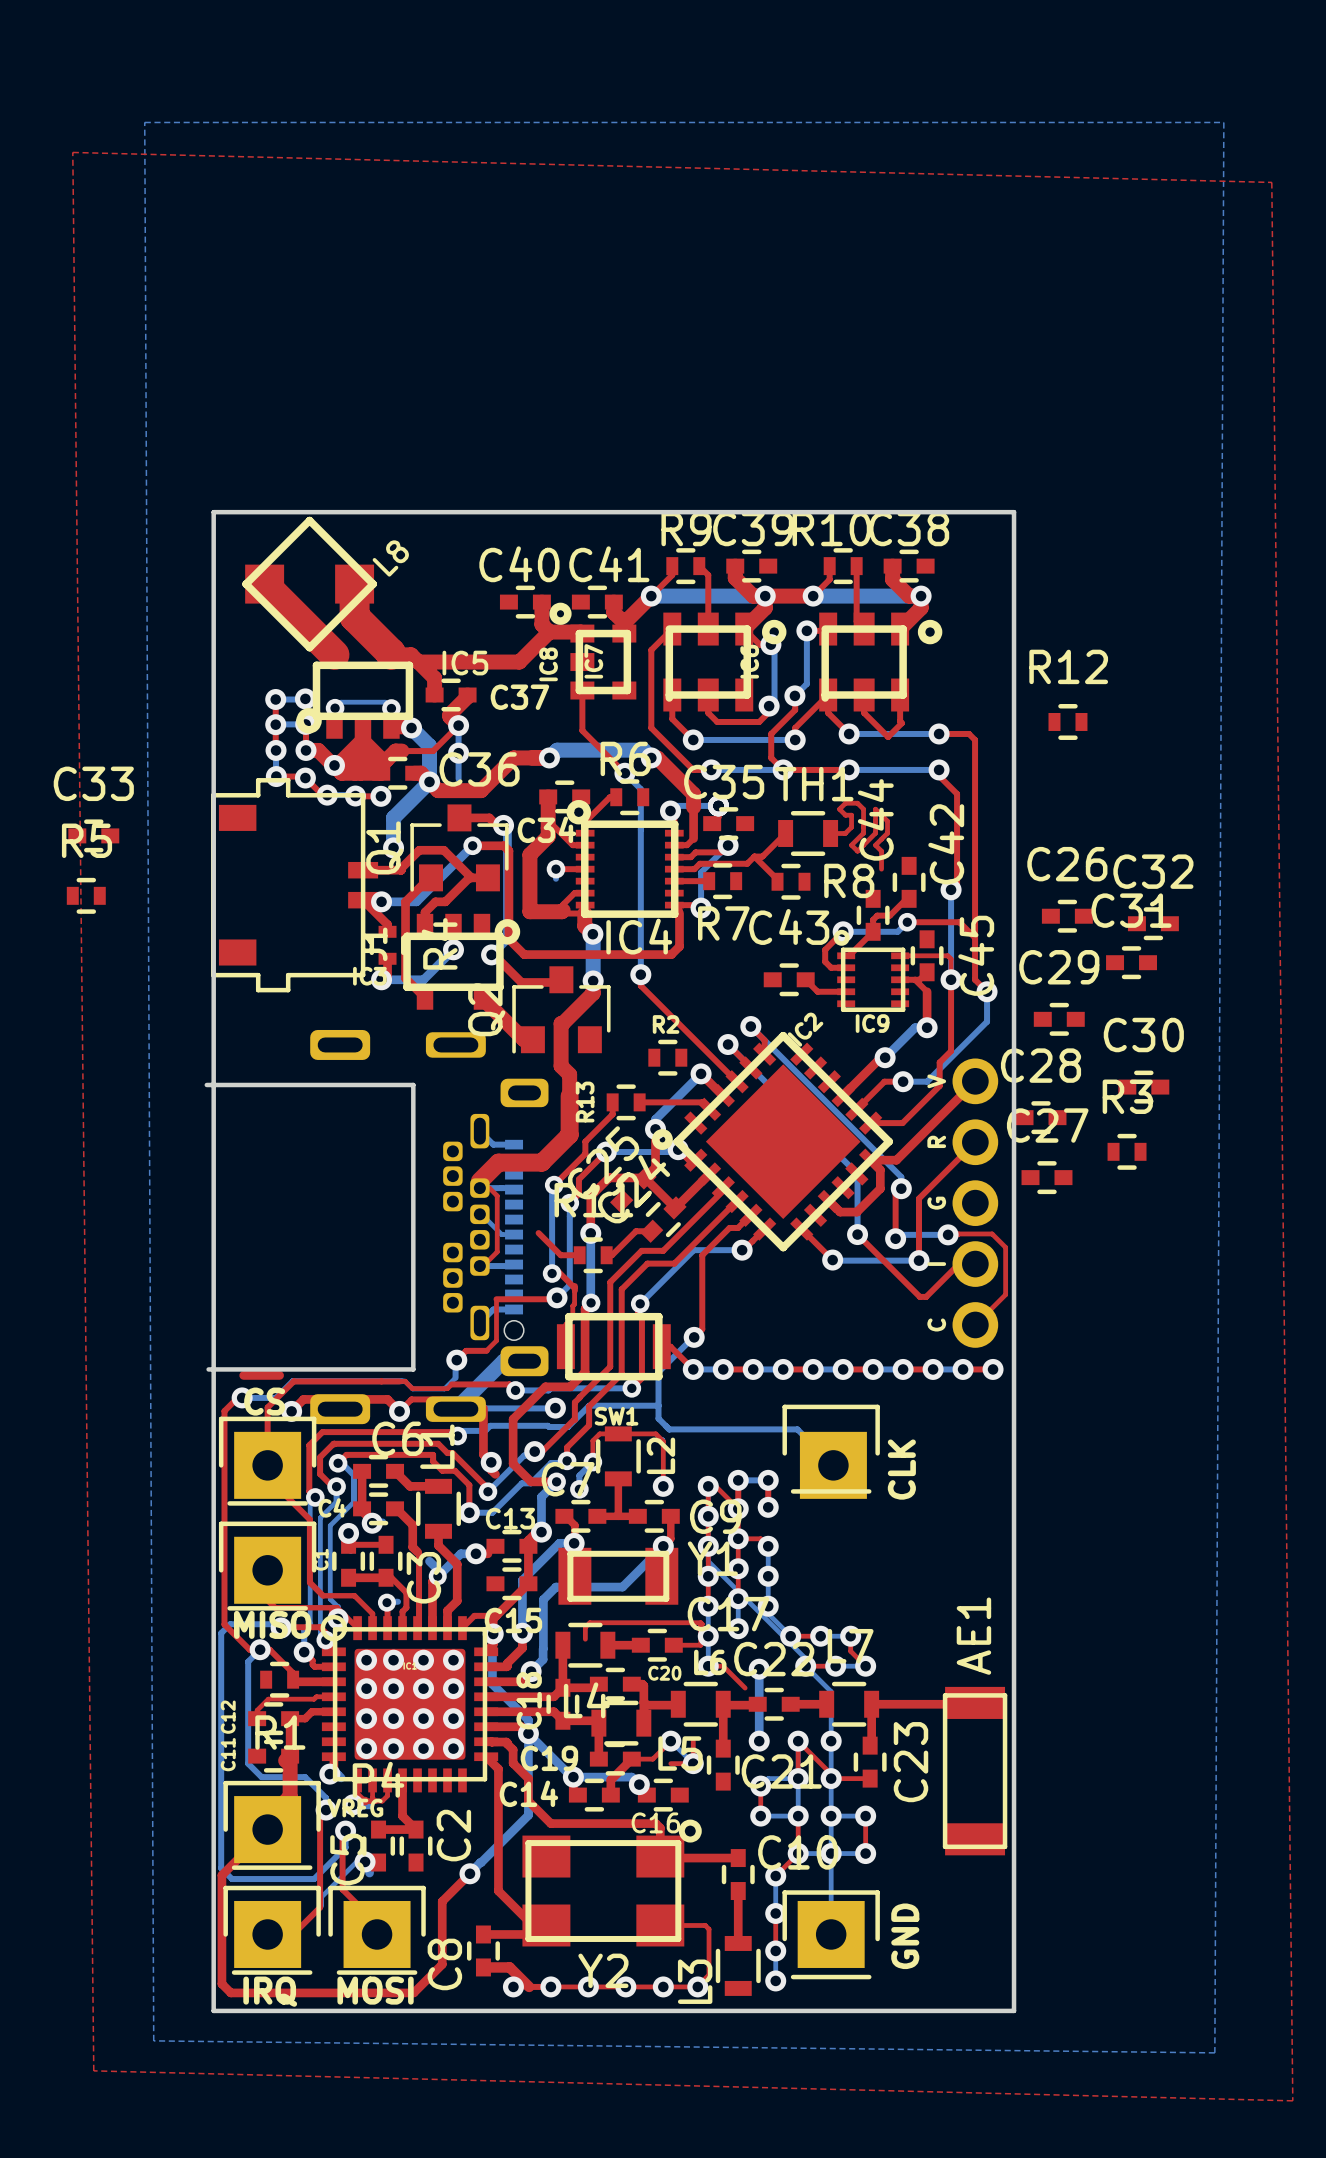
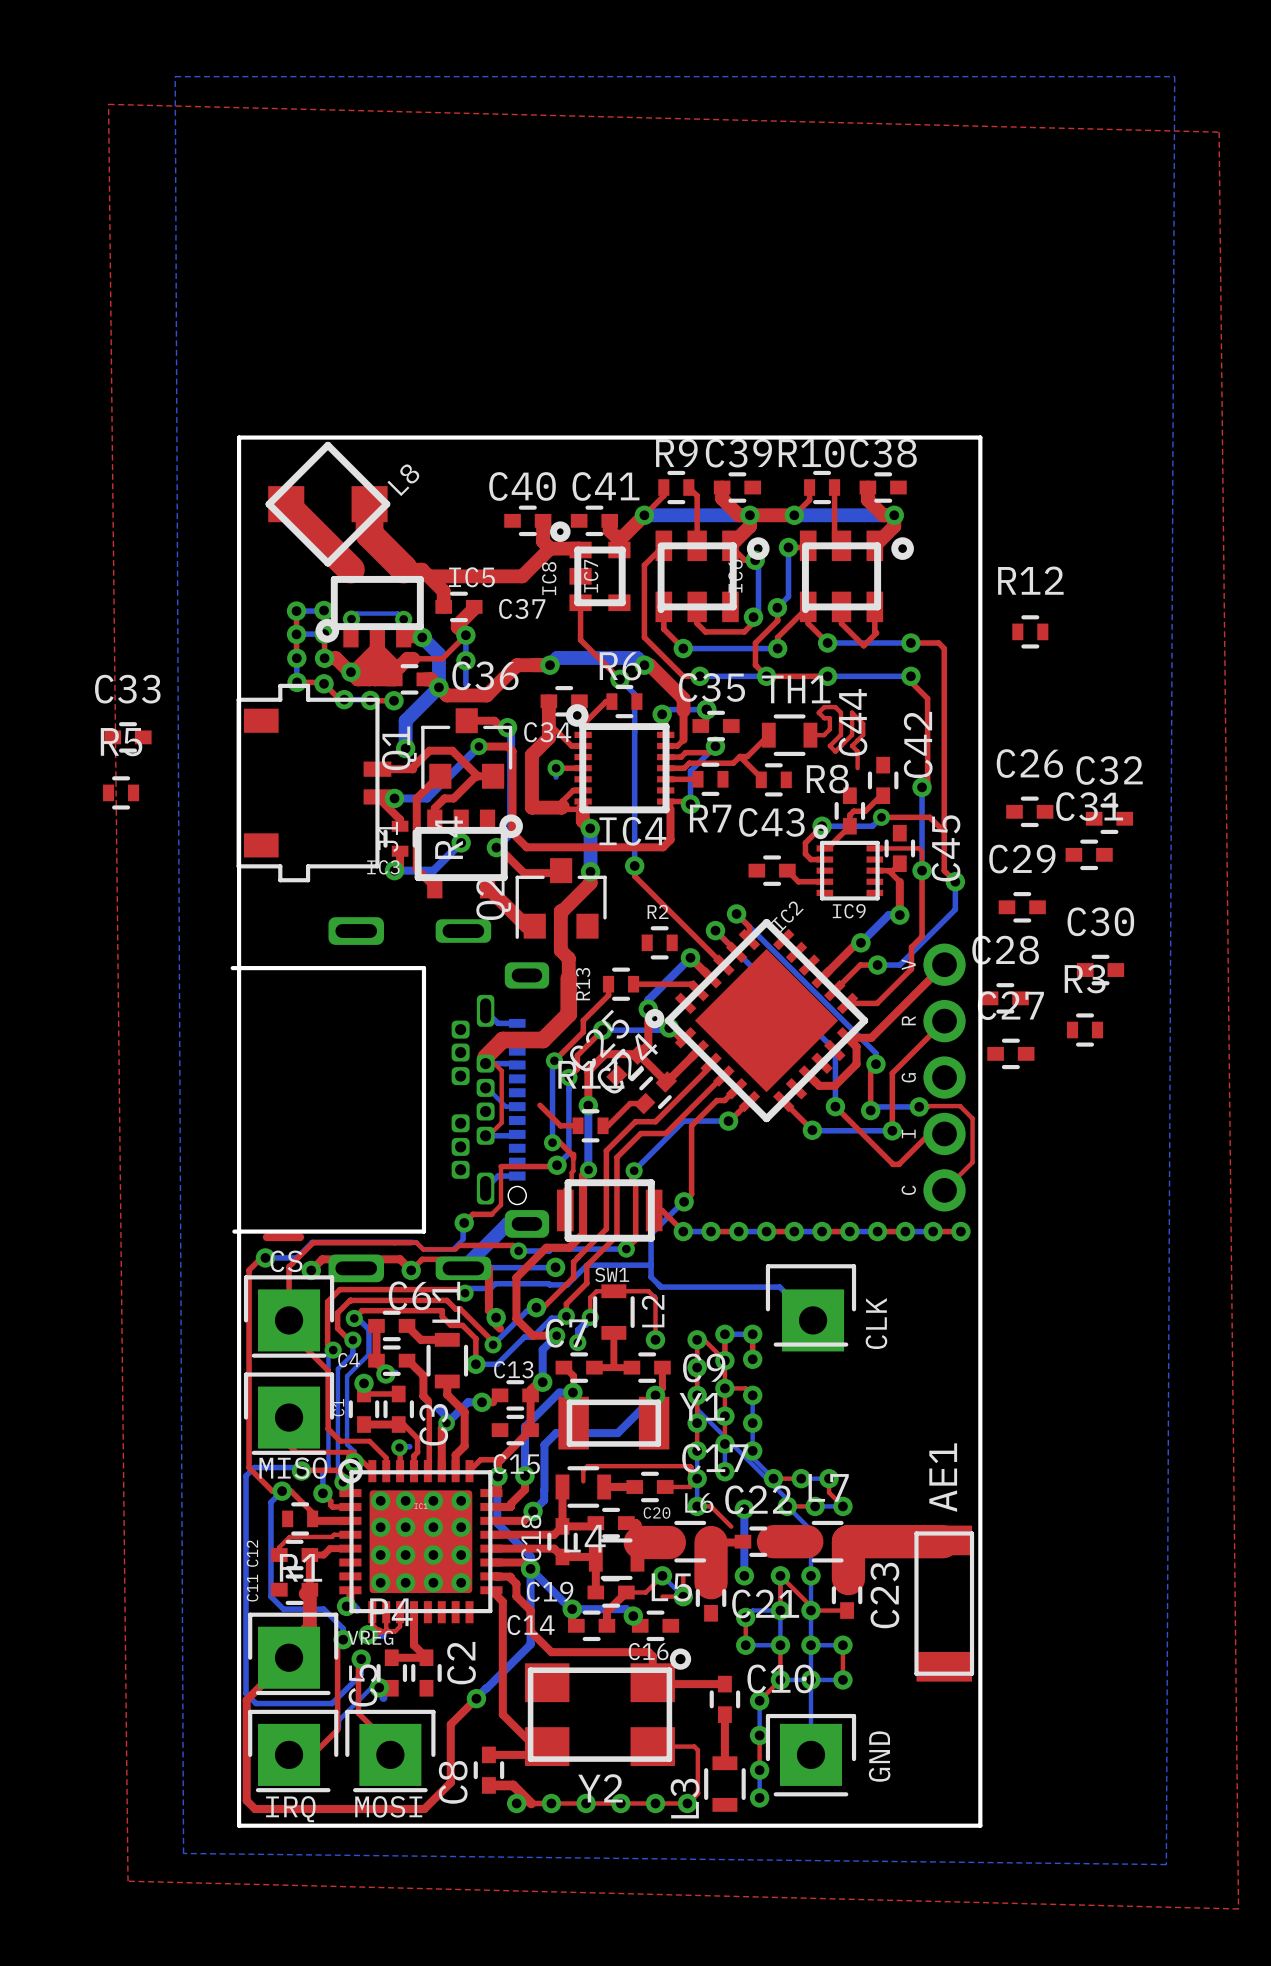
top track width: thin (790, 1704) (826, 1704) -> thick (773, 1541) (806, 1541)
top track width: thin (973, 1704) (871, 1704) (871, 1744) -> thick (943, 1541) (848, 1541) (848, 1578)
top track width: thin (646, 1705) (678, 1705) -> thick (640, 1542) (669, 1542)
top track width: thin (723, 1705) (723, 1748) -> thick (711, 1542) (711, 1582)

